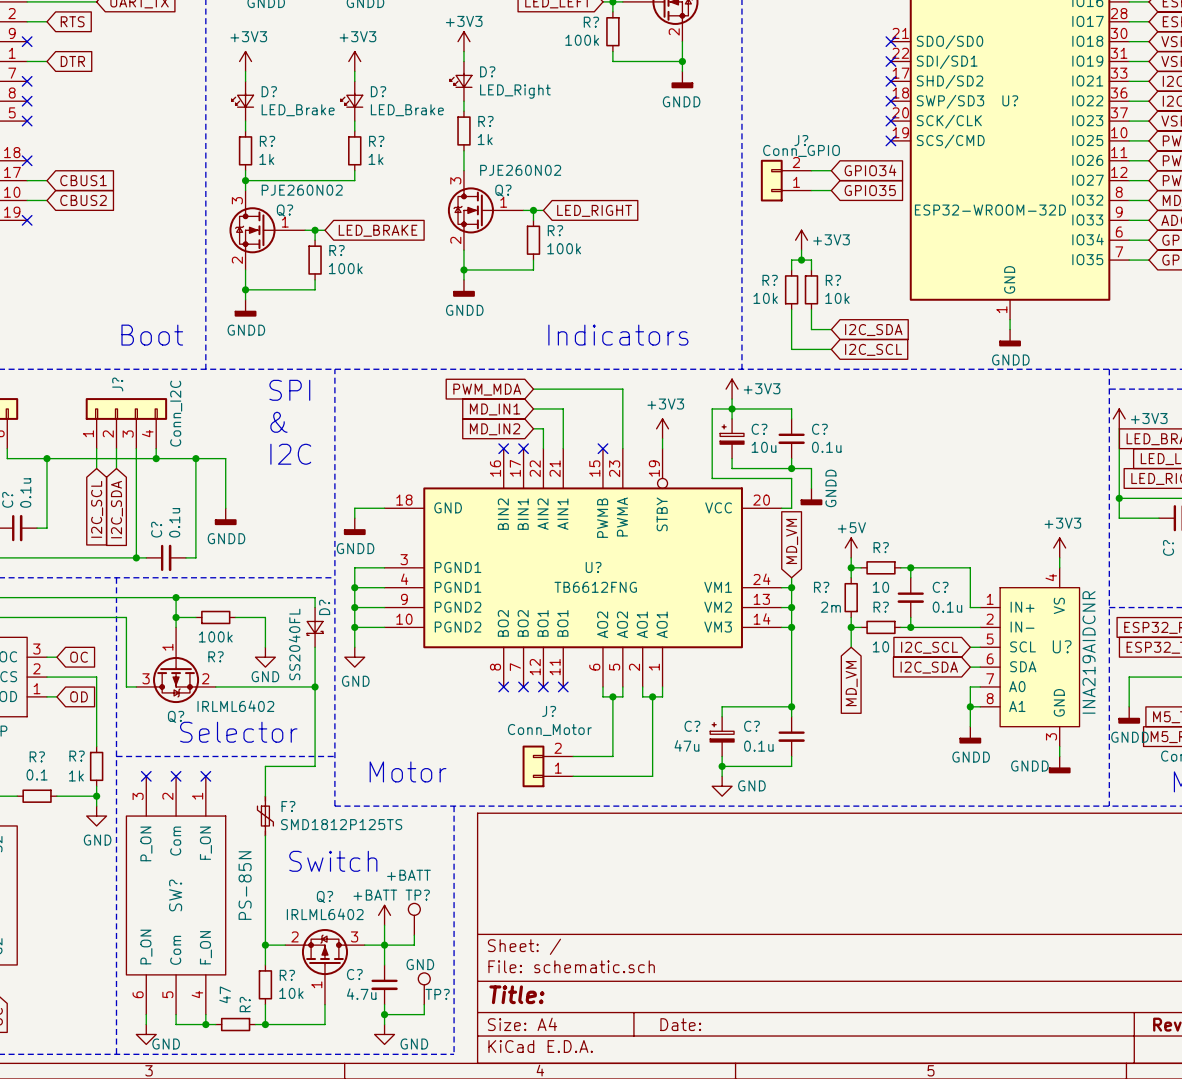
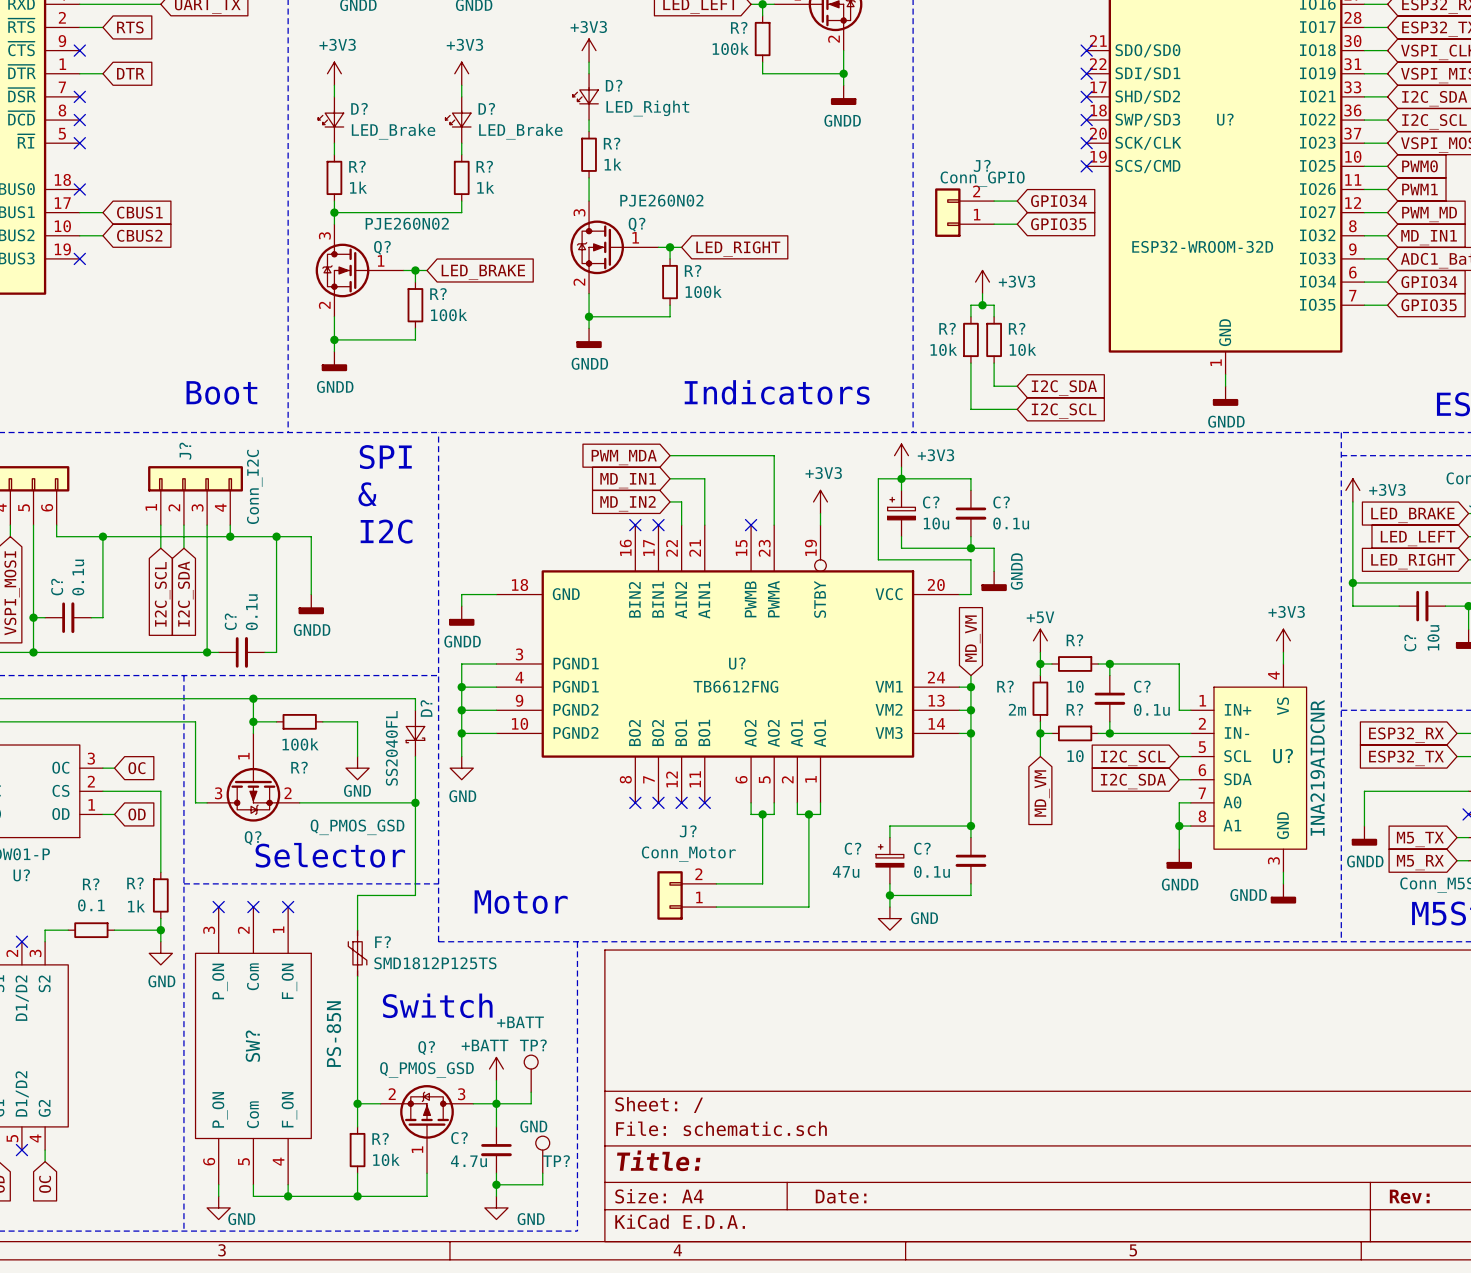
Q? value: IRLML6402 (235, 706) -> Q_PMOS_GSD (357, 827)
Q? value: IRLML6402 (325, 914) -> Q_PMOS_GSD (426, 1069)
wire: none -> (299, 1196) (345, 1196)
R?: 47 (235, 1024) -> none

